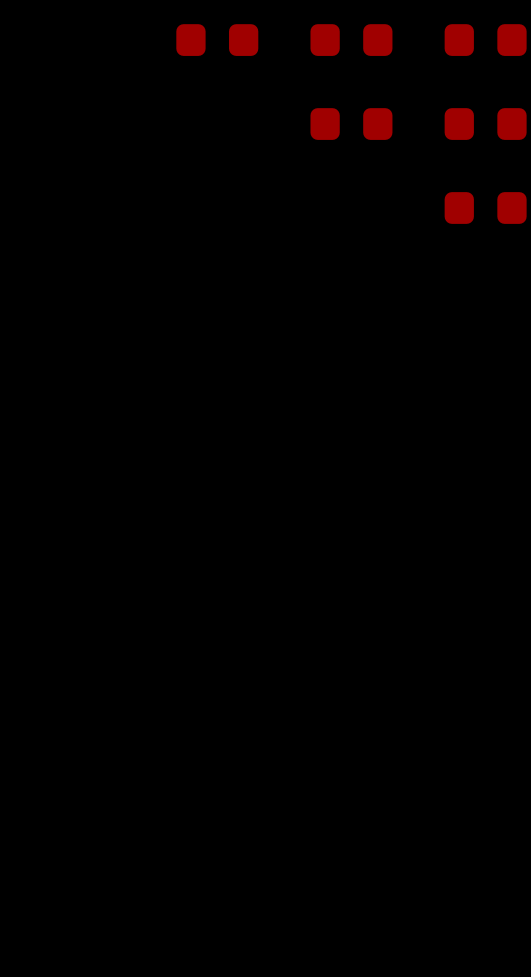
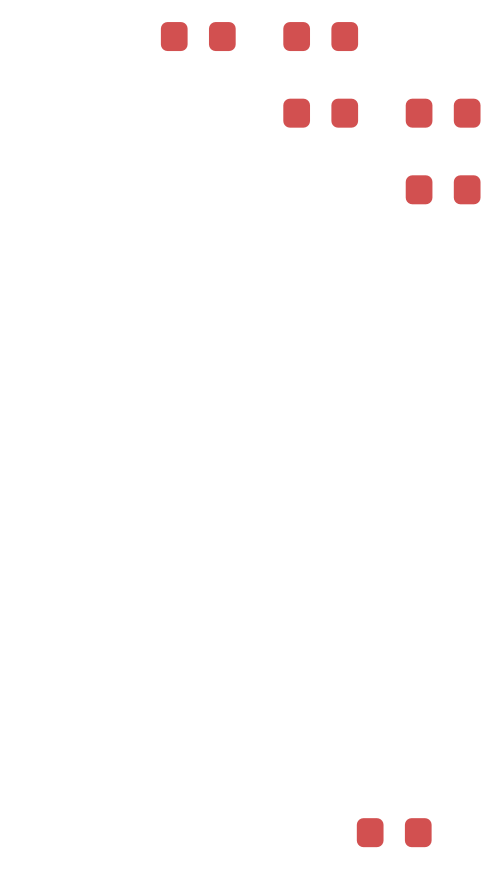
part: (485, 40) -> none
part: none -> (394, 832)

